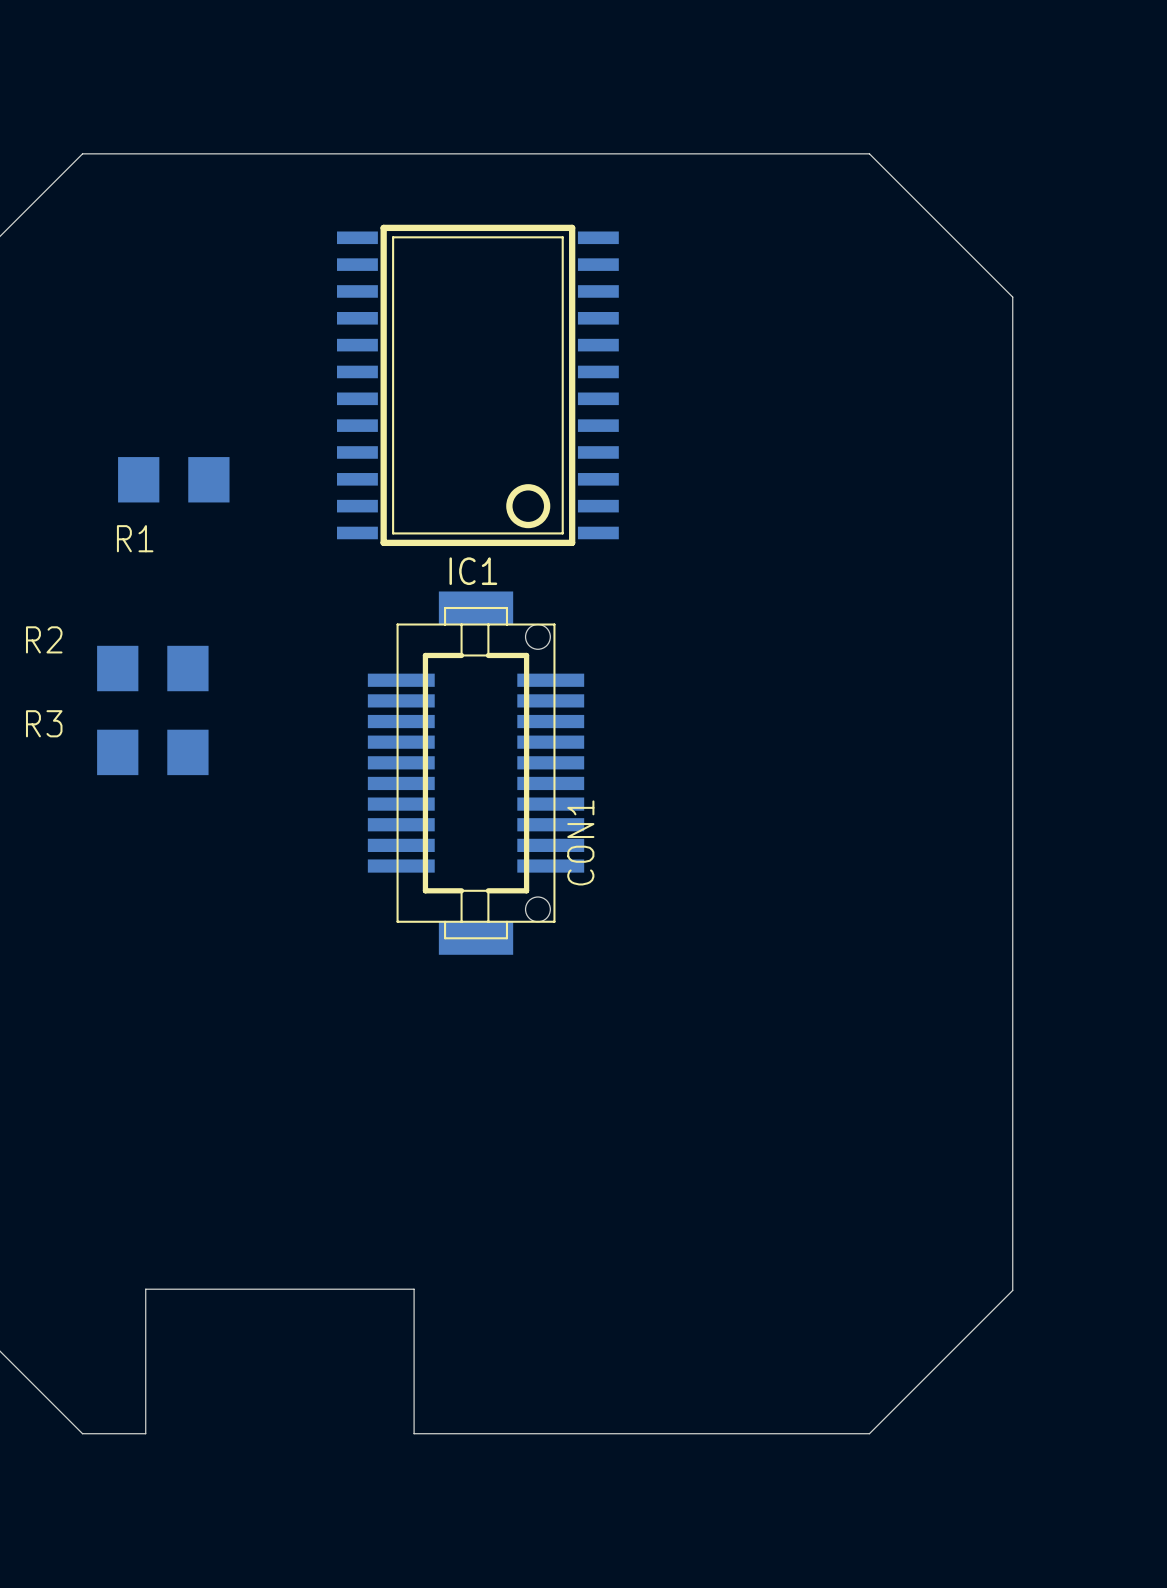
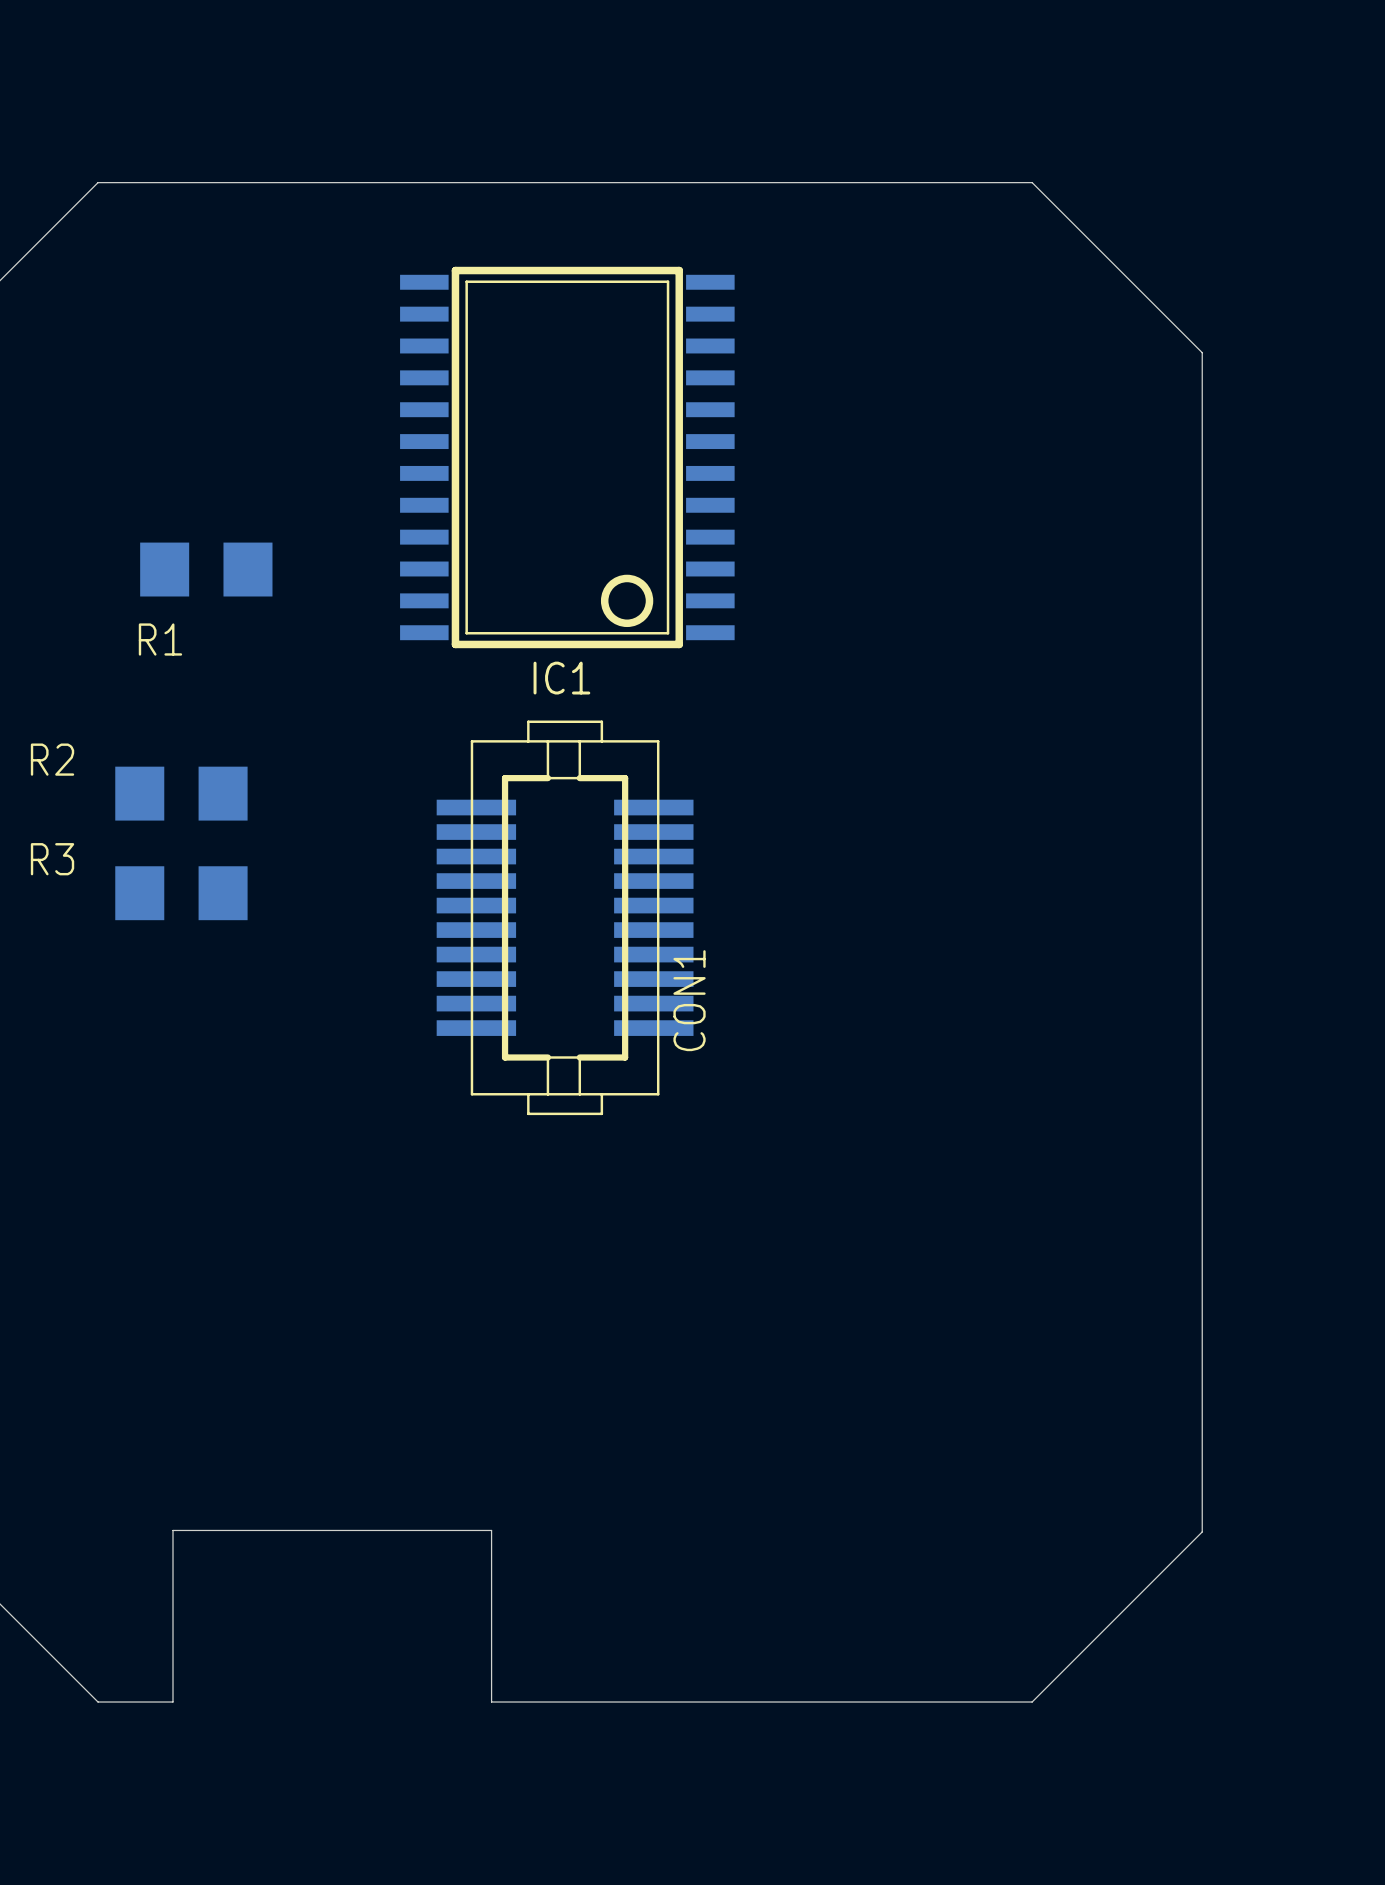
CON1 footprint: [367, 591, 585, 955] -> [436, 720, 694, 1116]

